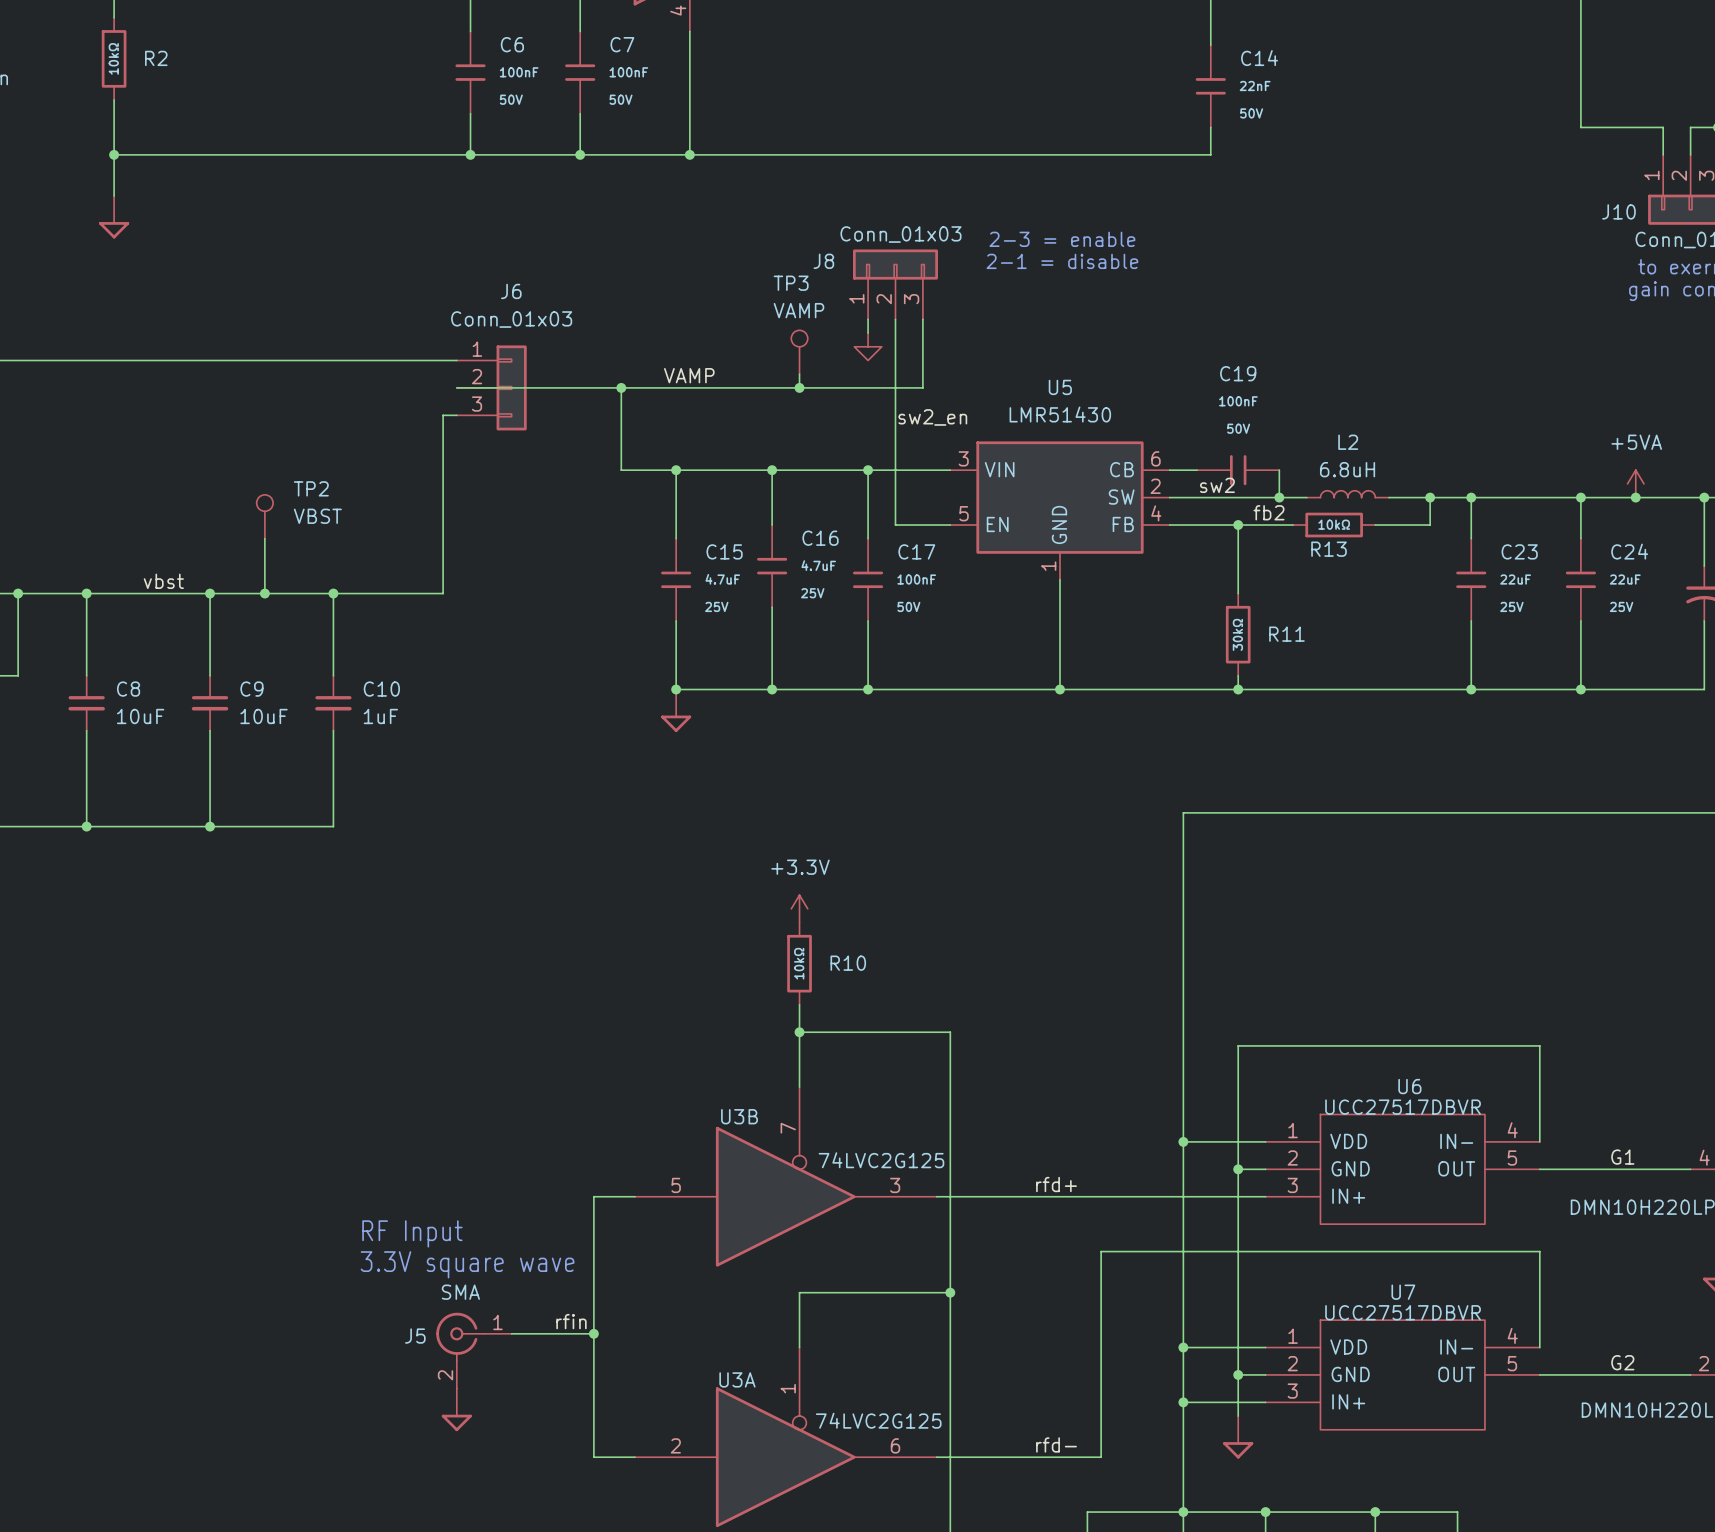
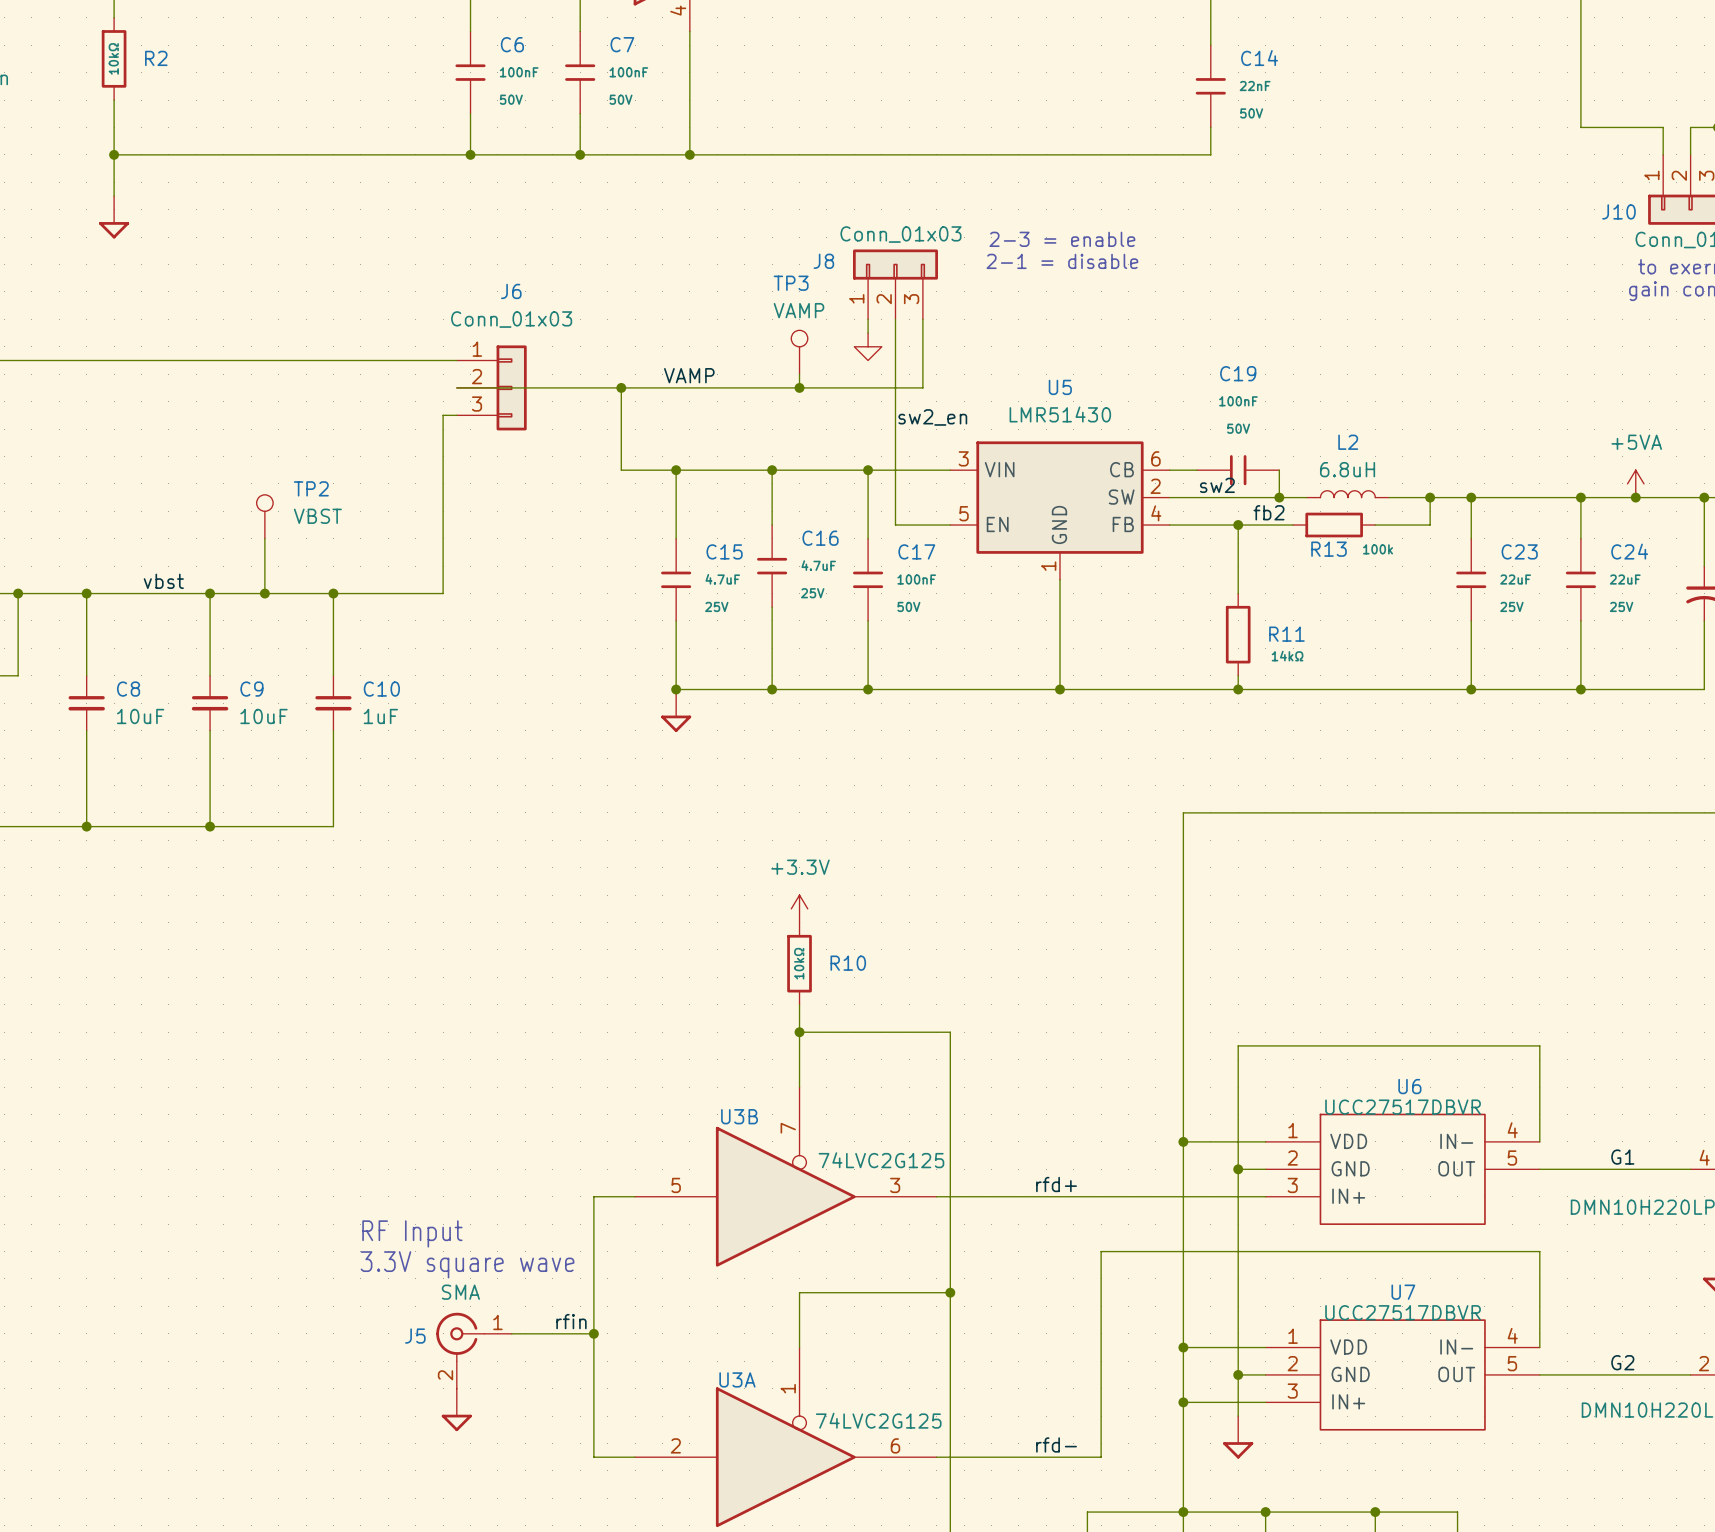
R13 value: 10kΩ (1334, 524) -> 100k (1378, 549)
R11 value: 30kΩ (1237, 634) -> 14kΩ (1287, 656)

